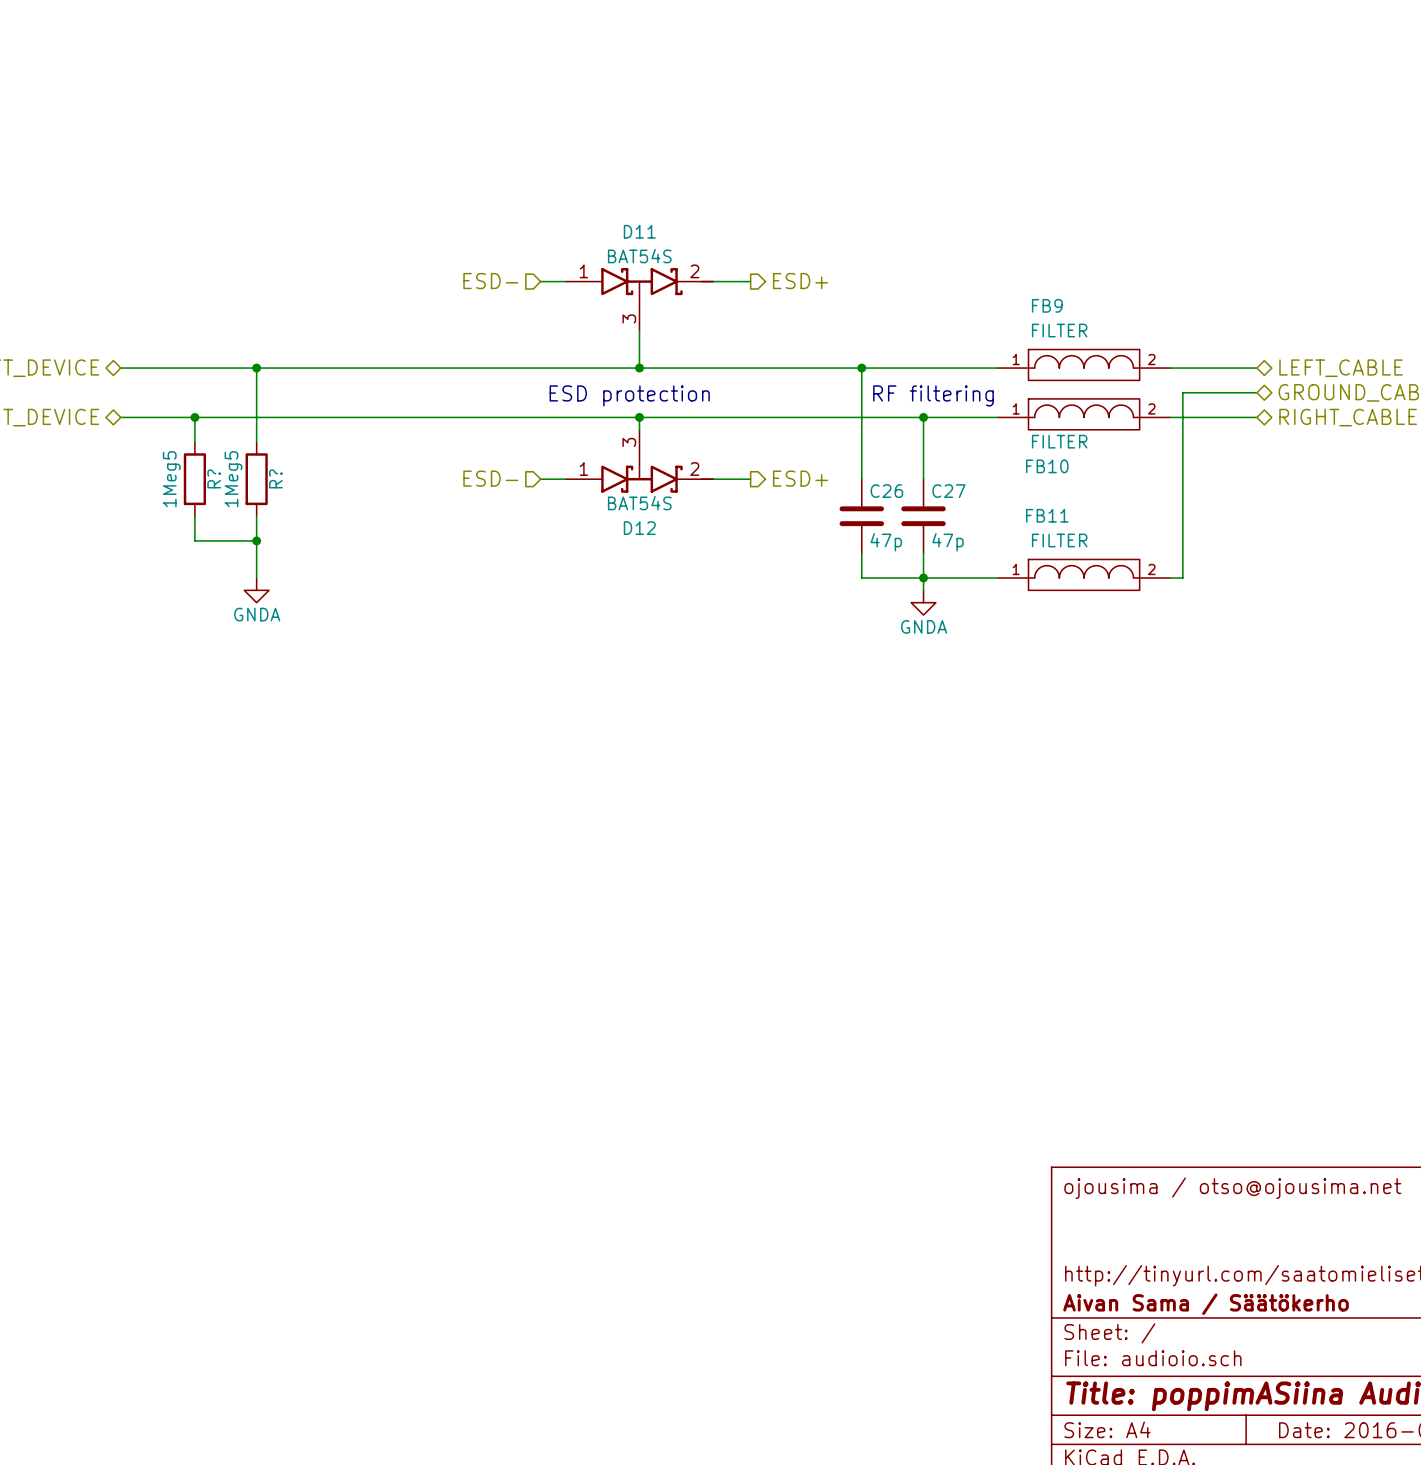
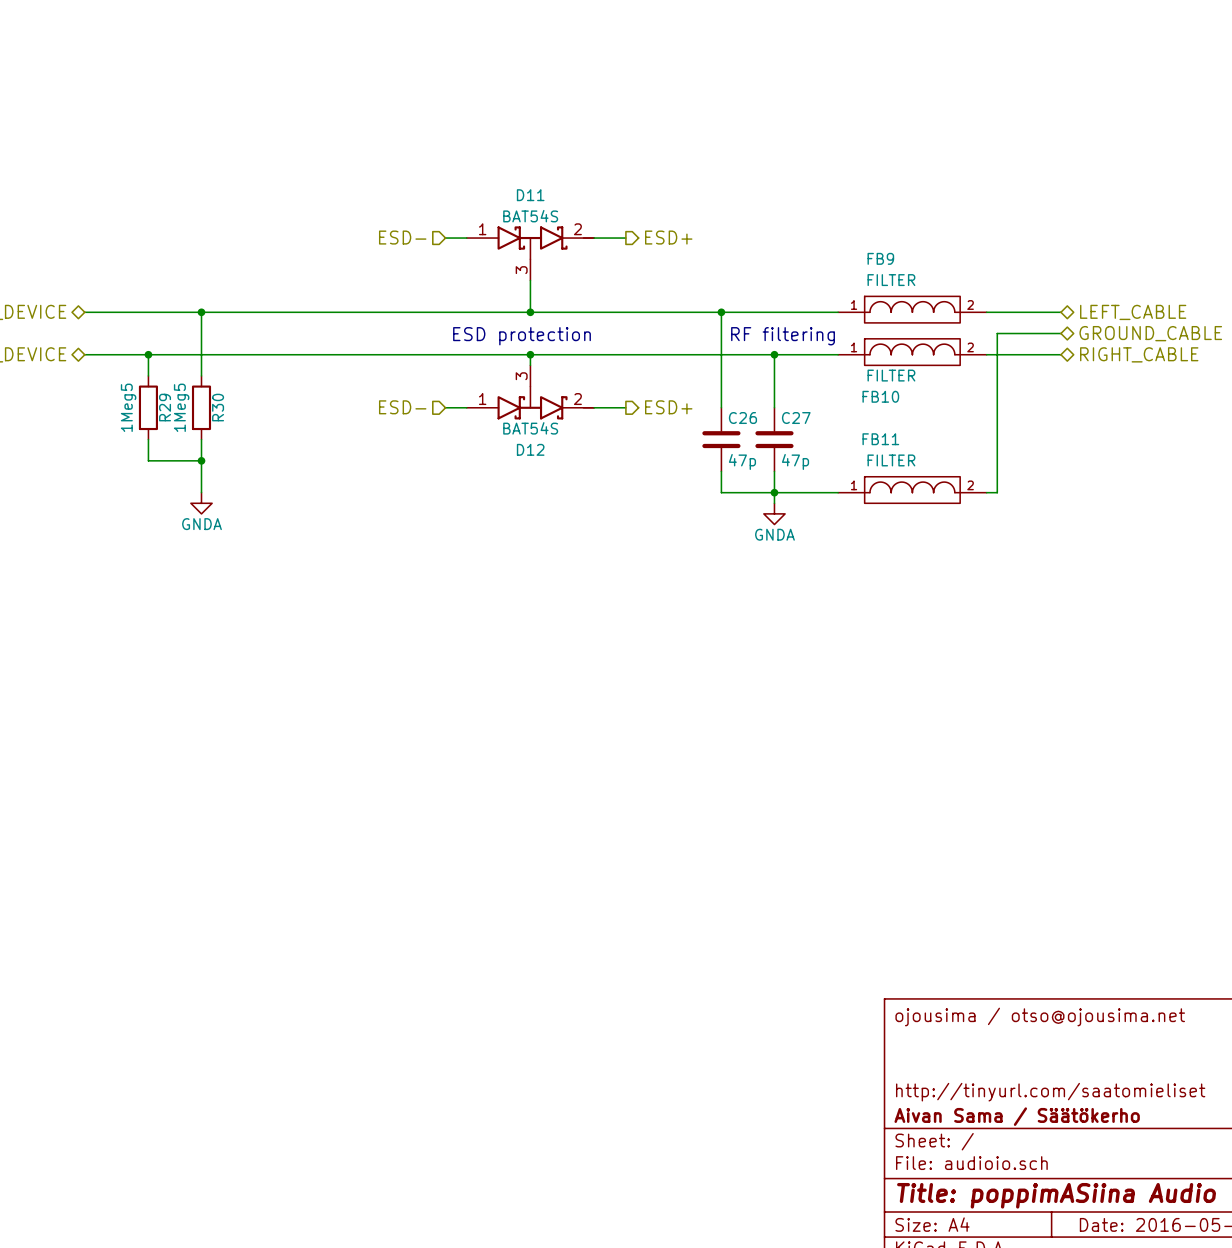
R? name: R? (214, 478) -> R29 (165, 407)
R? name: R? (275, 478) -> R30 (218, 407)

